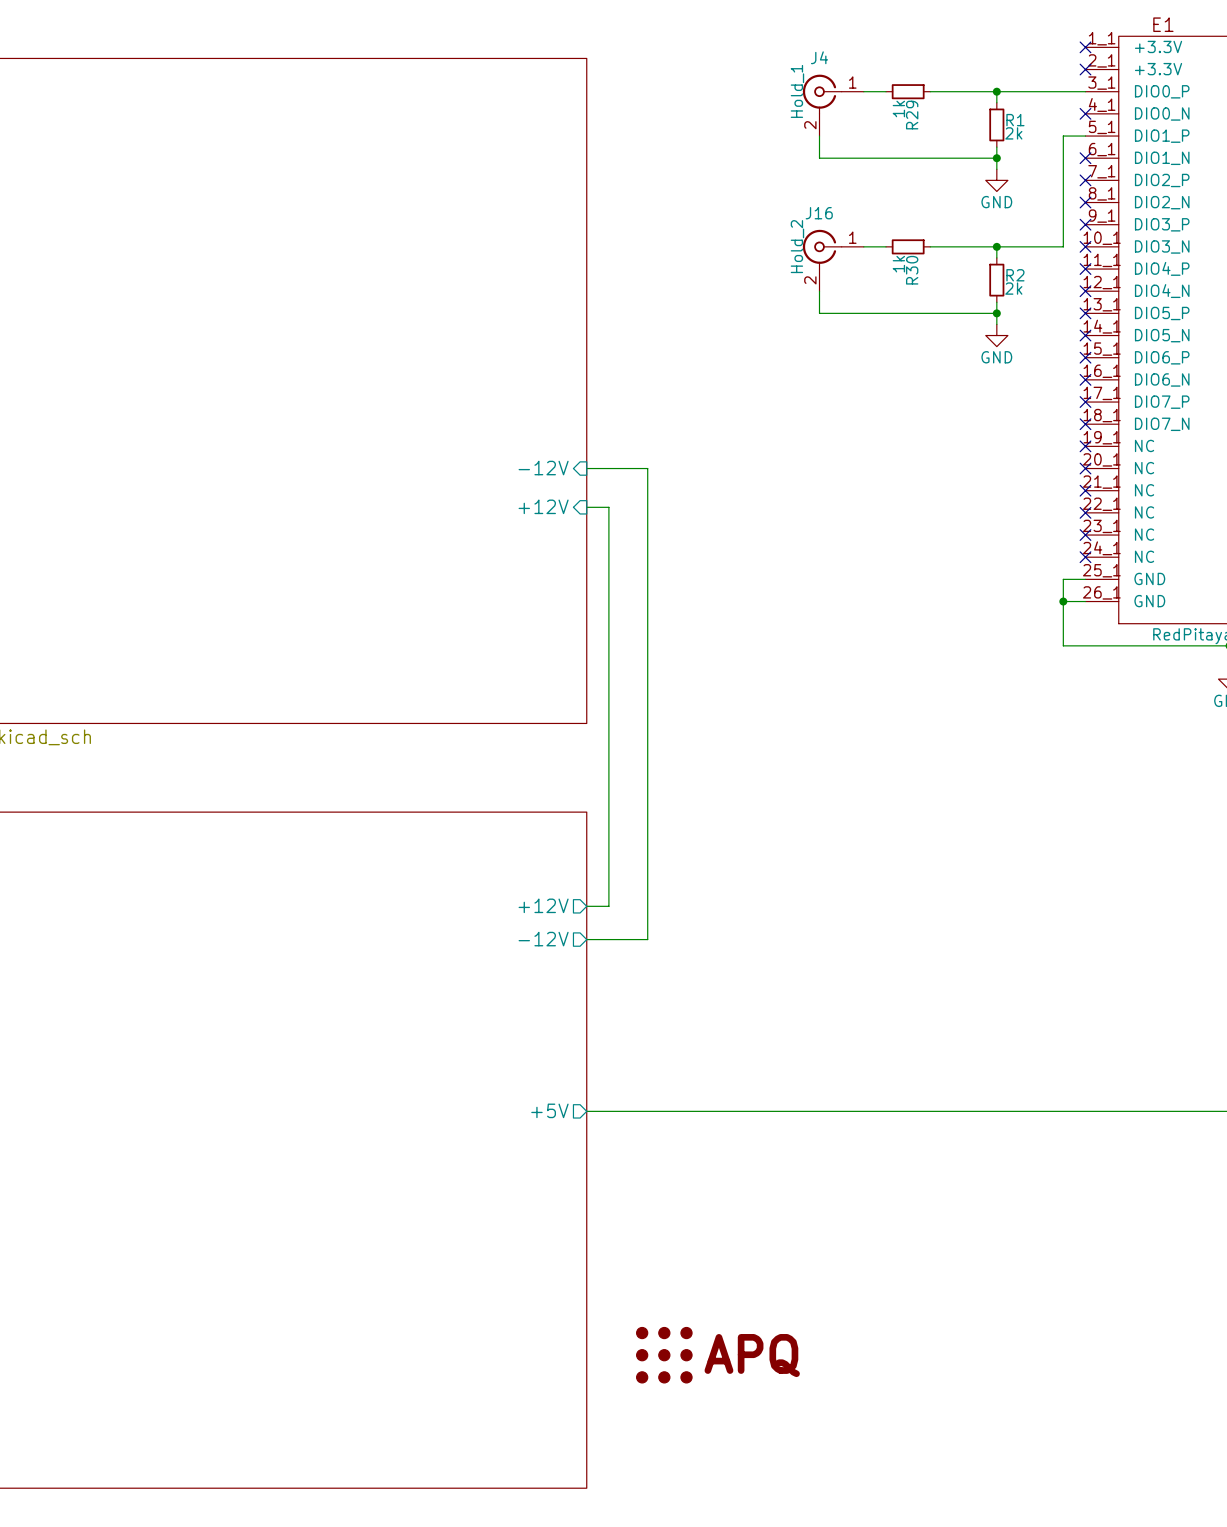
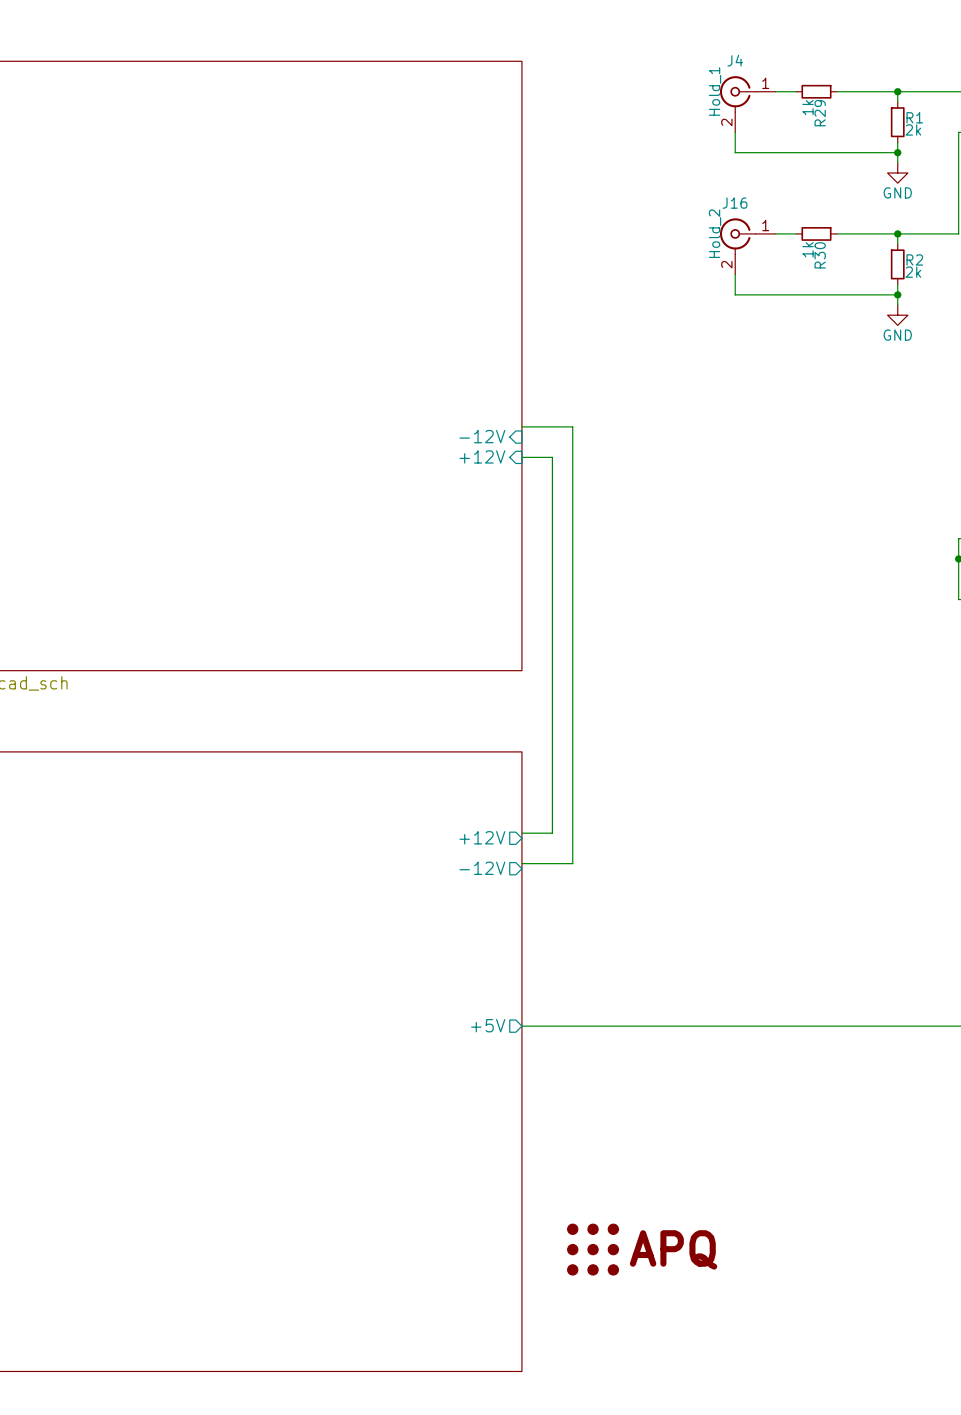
wire: none -> (521, 426) (572, 426) (572, 863) (521, 863)
wire: (586, 468) (647, 468) (647, 939) (586, 939) -> none
wire: none -> (521, 457) (552, 457) (552, 833) (521, 833)
sheet pin position: +12V (543, 506) -> +12V (482, 456)
wire: (586, 507) (608, 507) (608, 906) (586, 906) -> none

